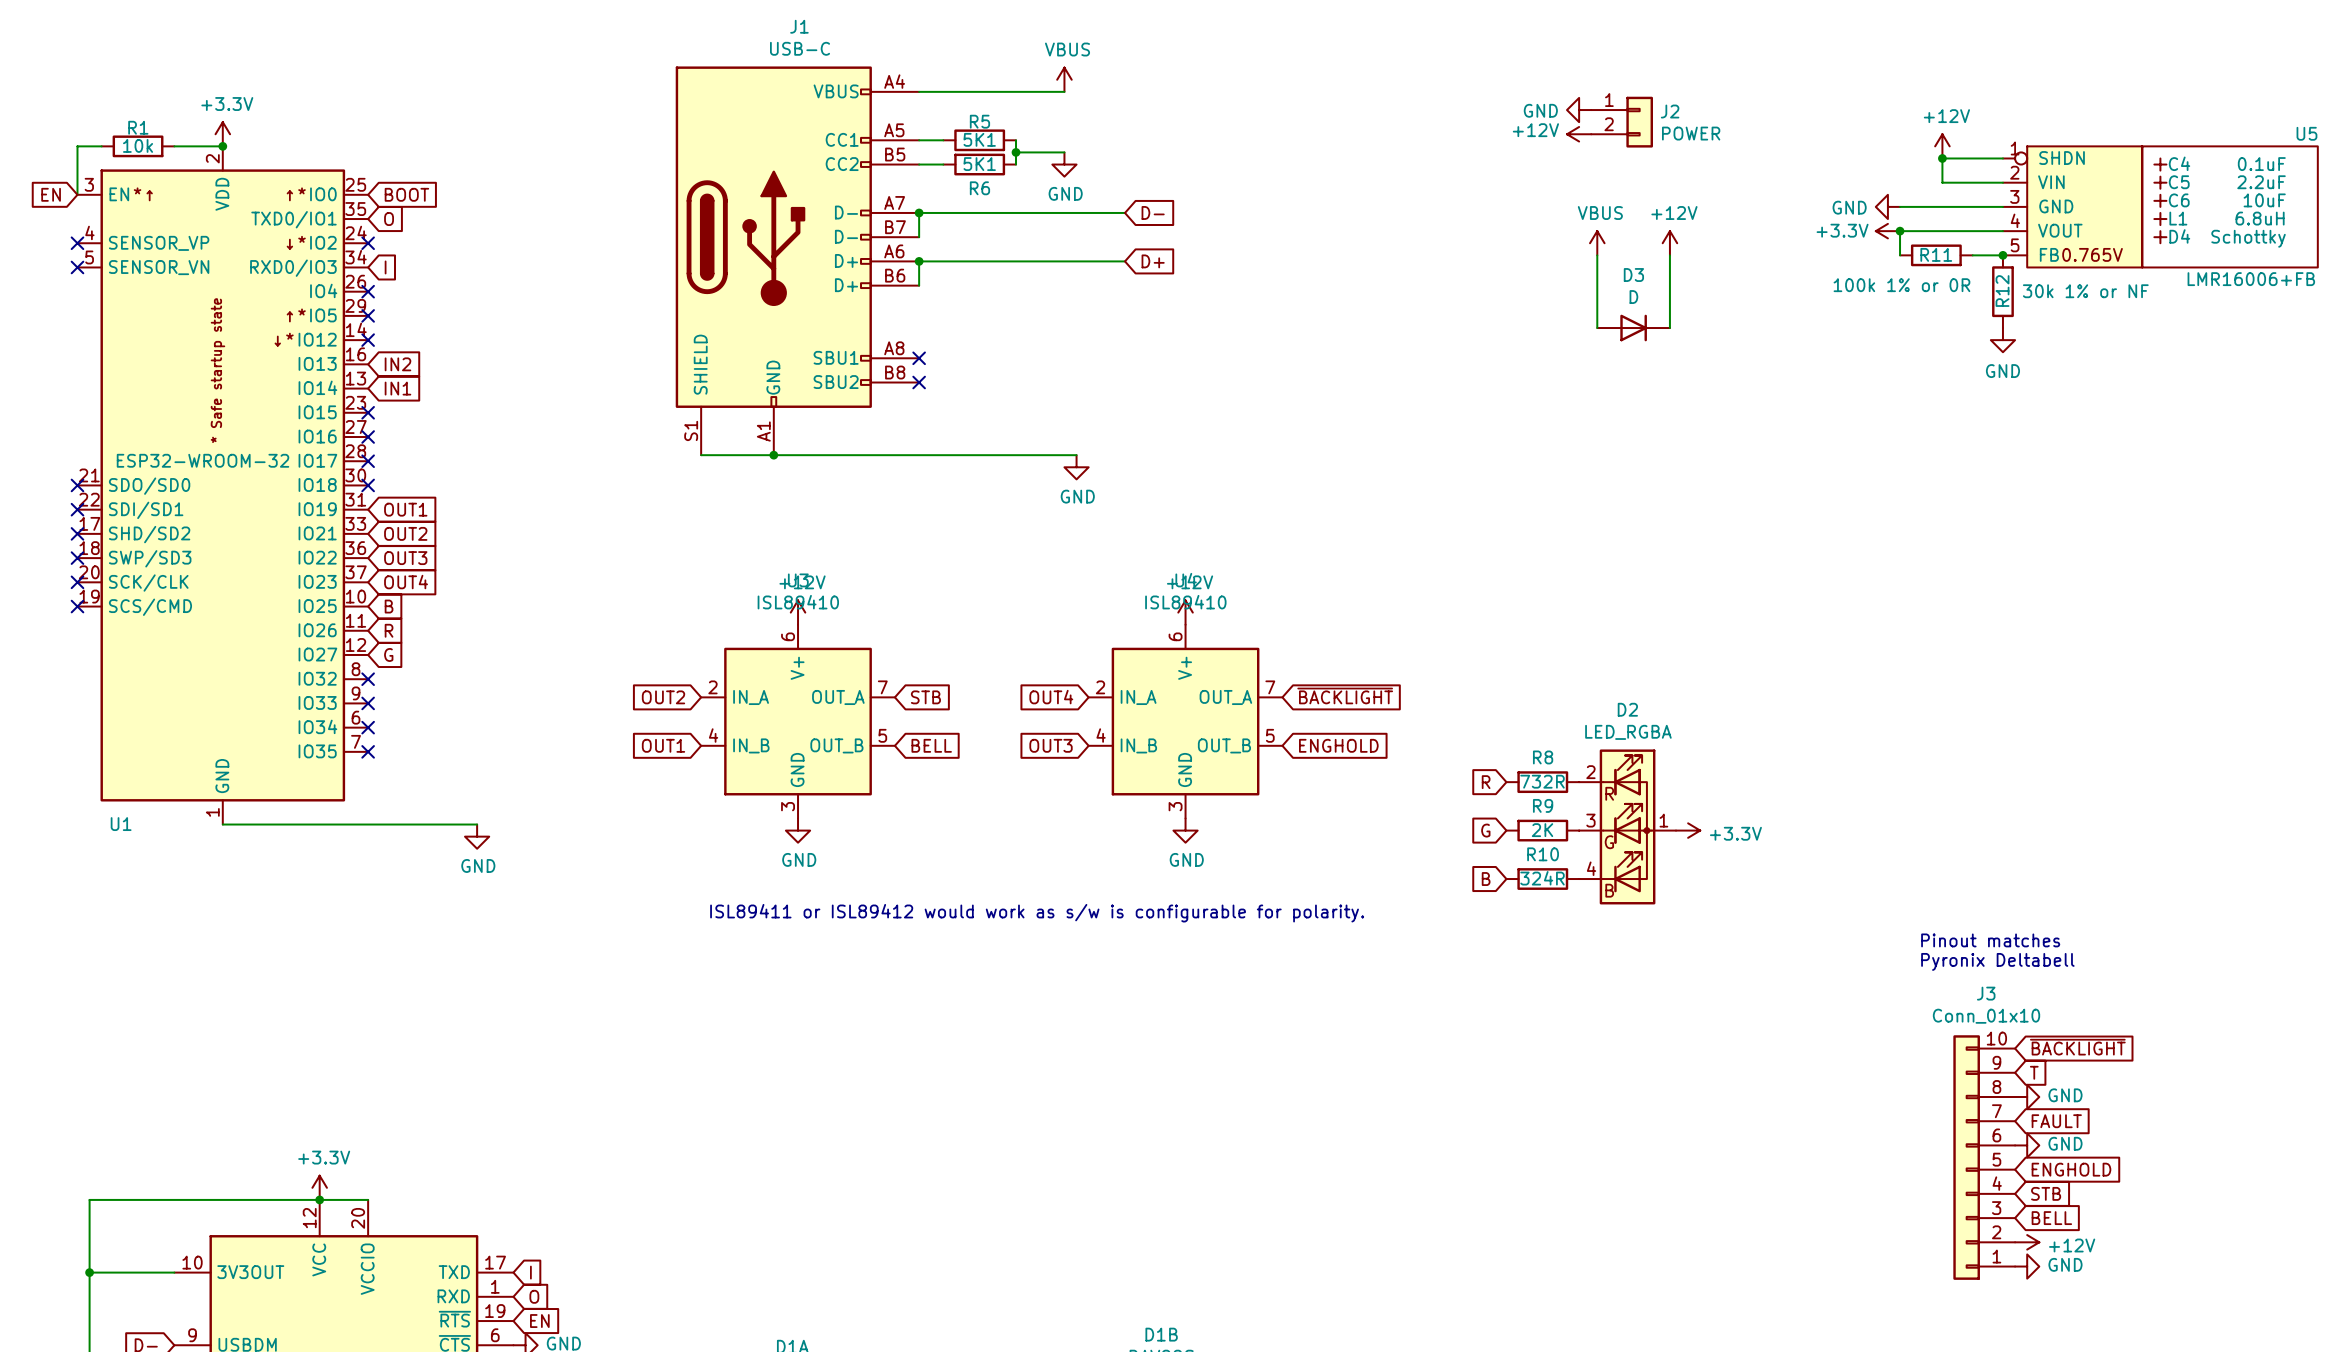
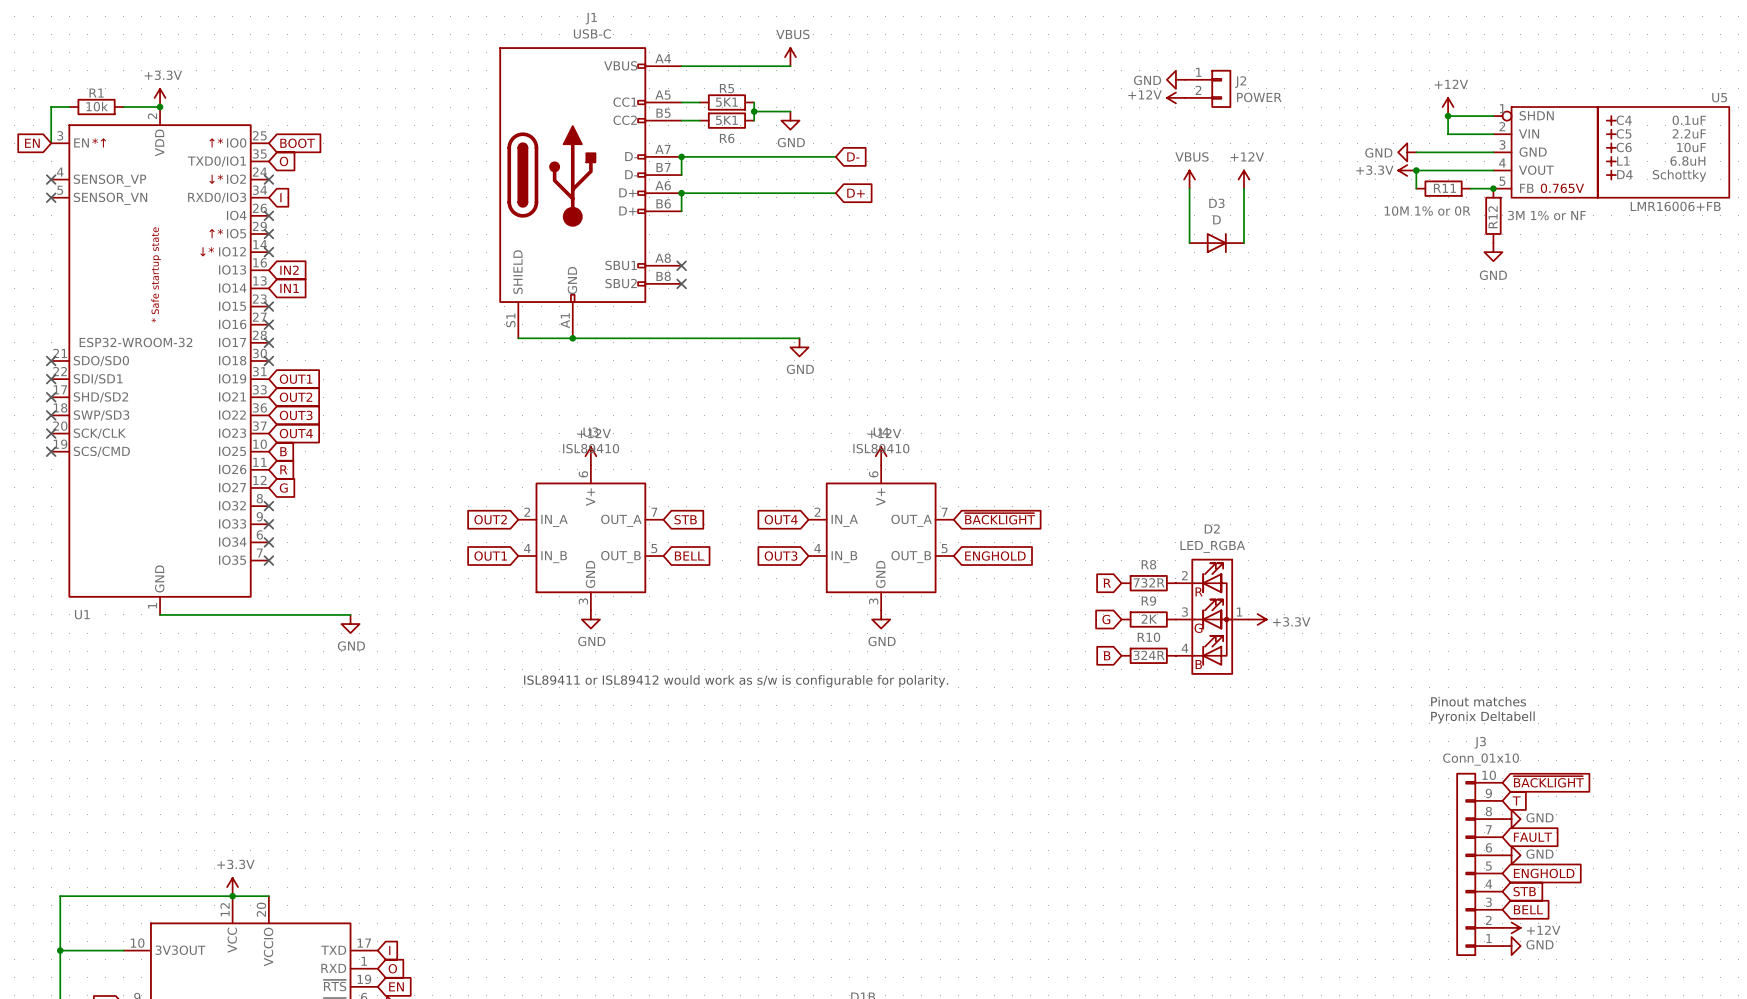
R11 value: 100k 1% or 0R (1901, 285) -> 10M 1% or 0R (1427, 210)
R12 value: 30k 1% or NF (2085, 291) -> 3M 1% or NF (1546, 215)

